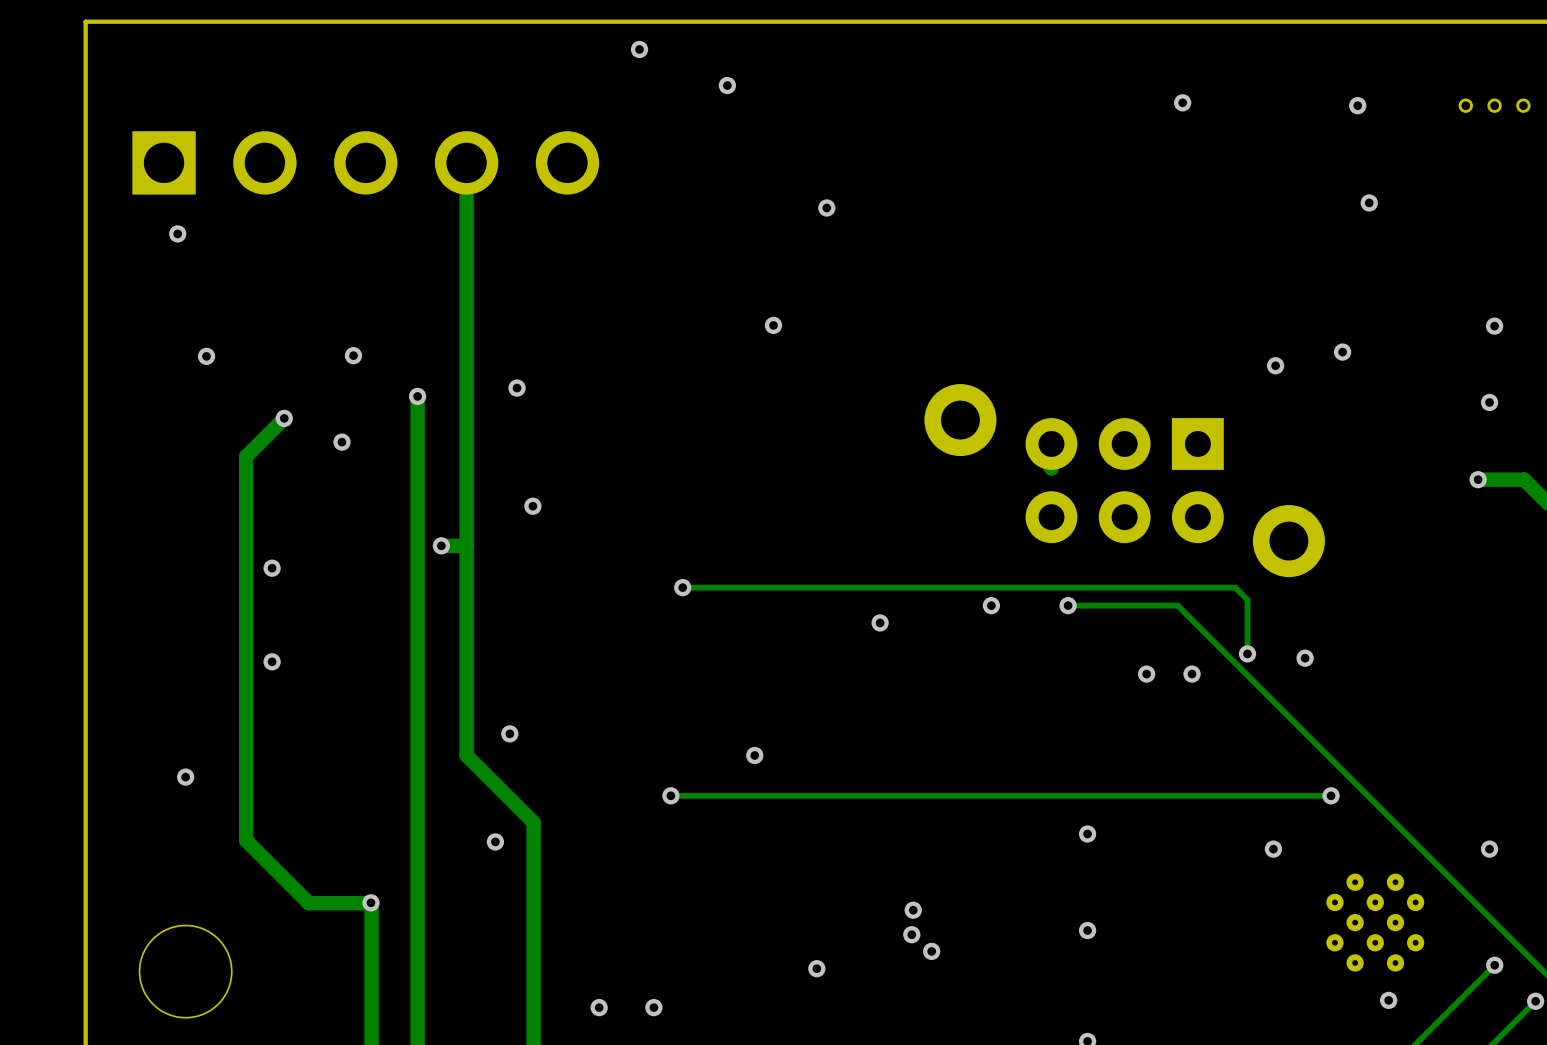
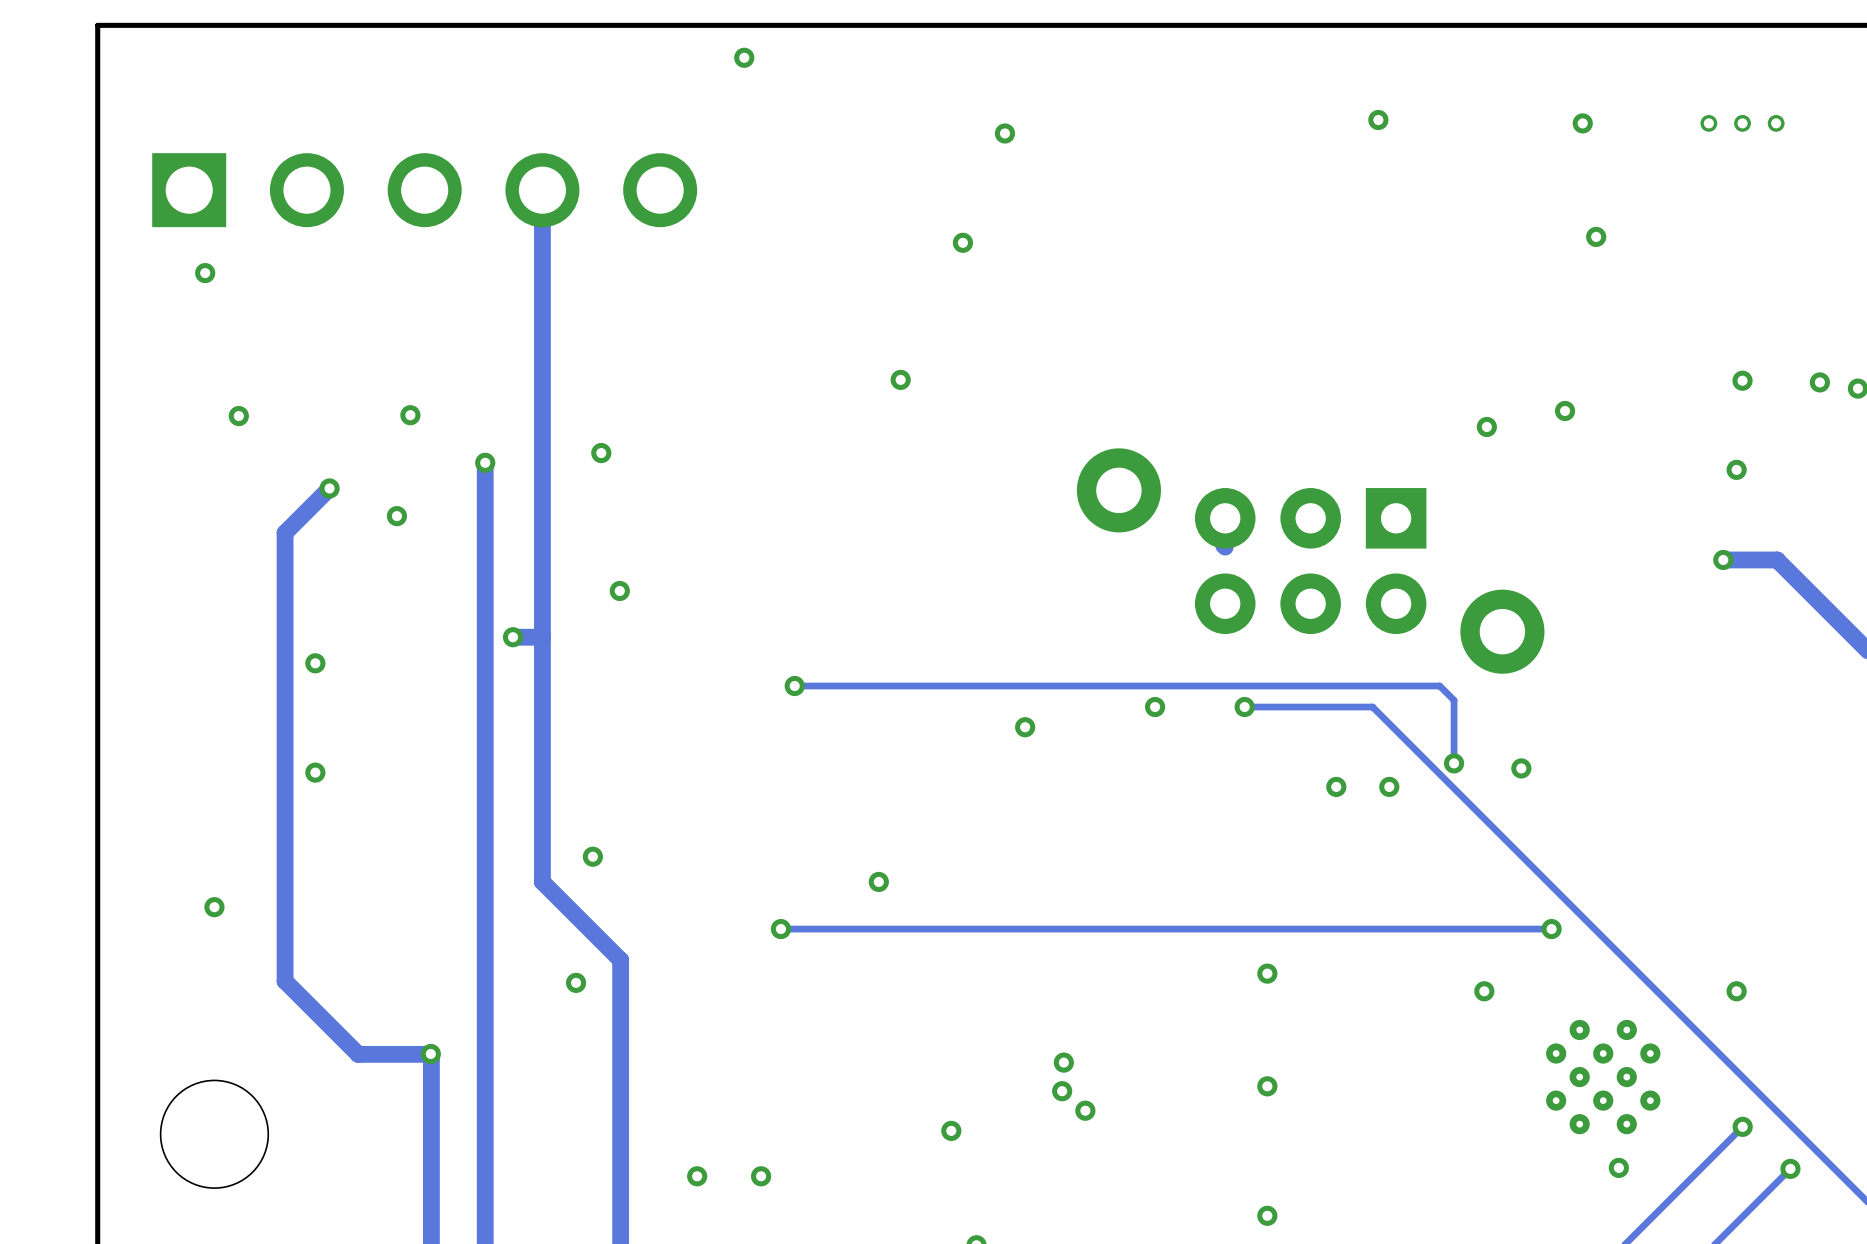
via position: (727, 85) -> (1004, 133)

